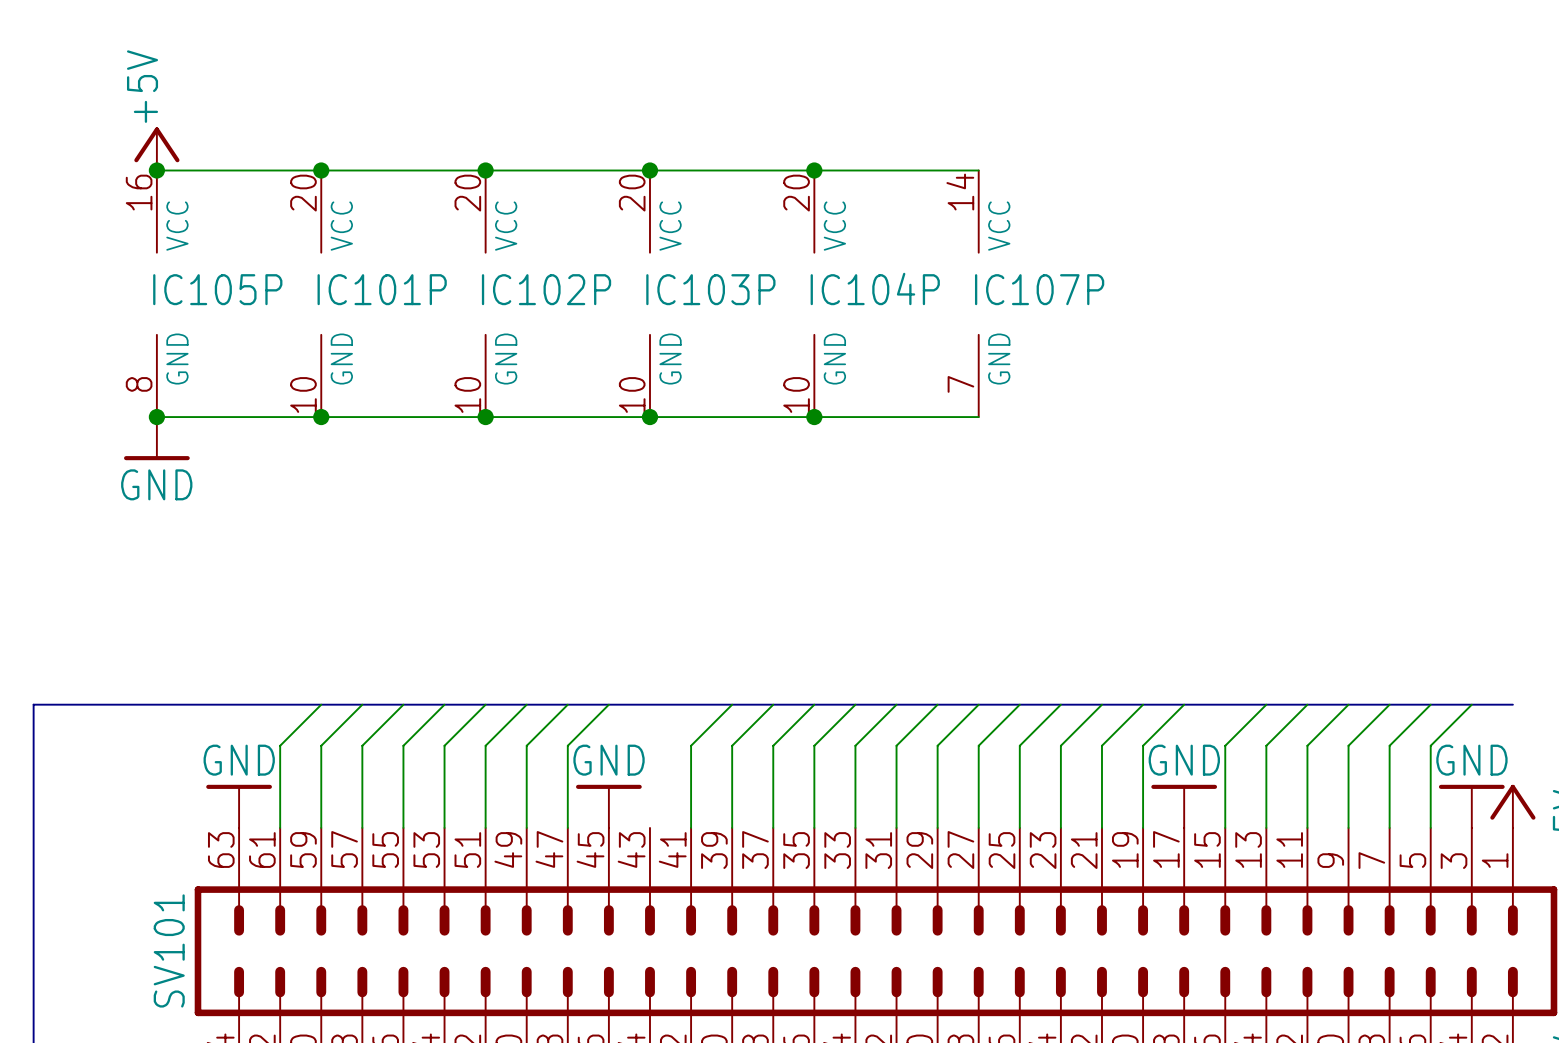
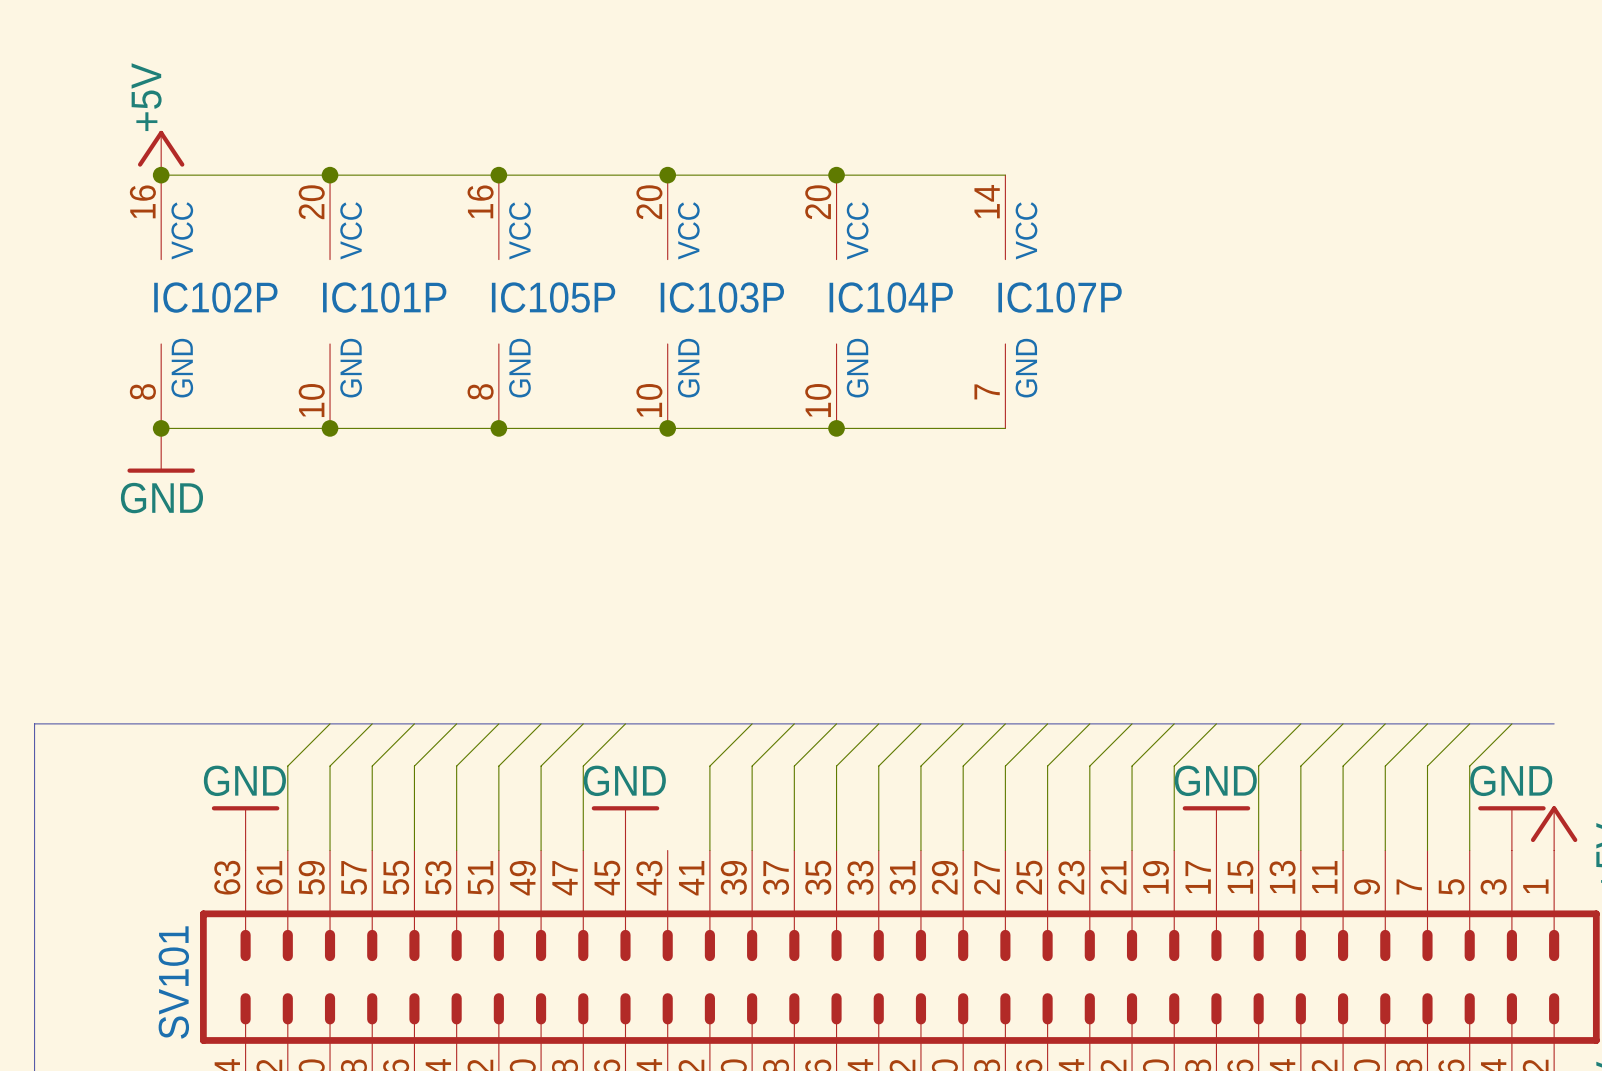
IC102P pin number: 20 (467, 193) -> 16 (480, 201)
IC105P name: IC105P (217, 289) -> IC102P (215, 297)
IC102P name: IC102P (546, 289) -> IC105P (553, 297)
IC102P pin number: 10 (467, 394) -> 8 (480, 391)

